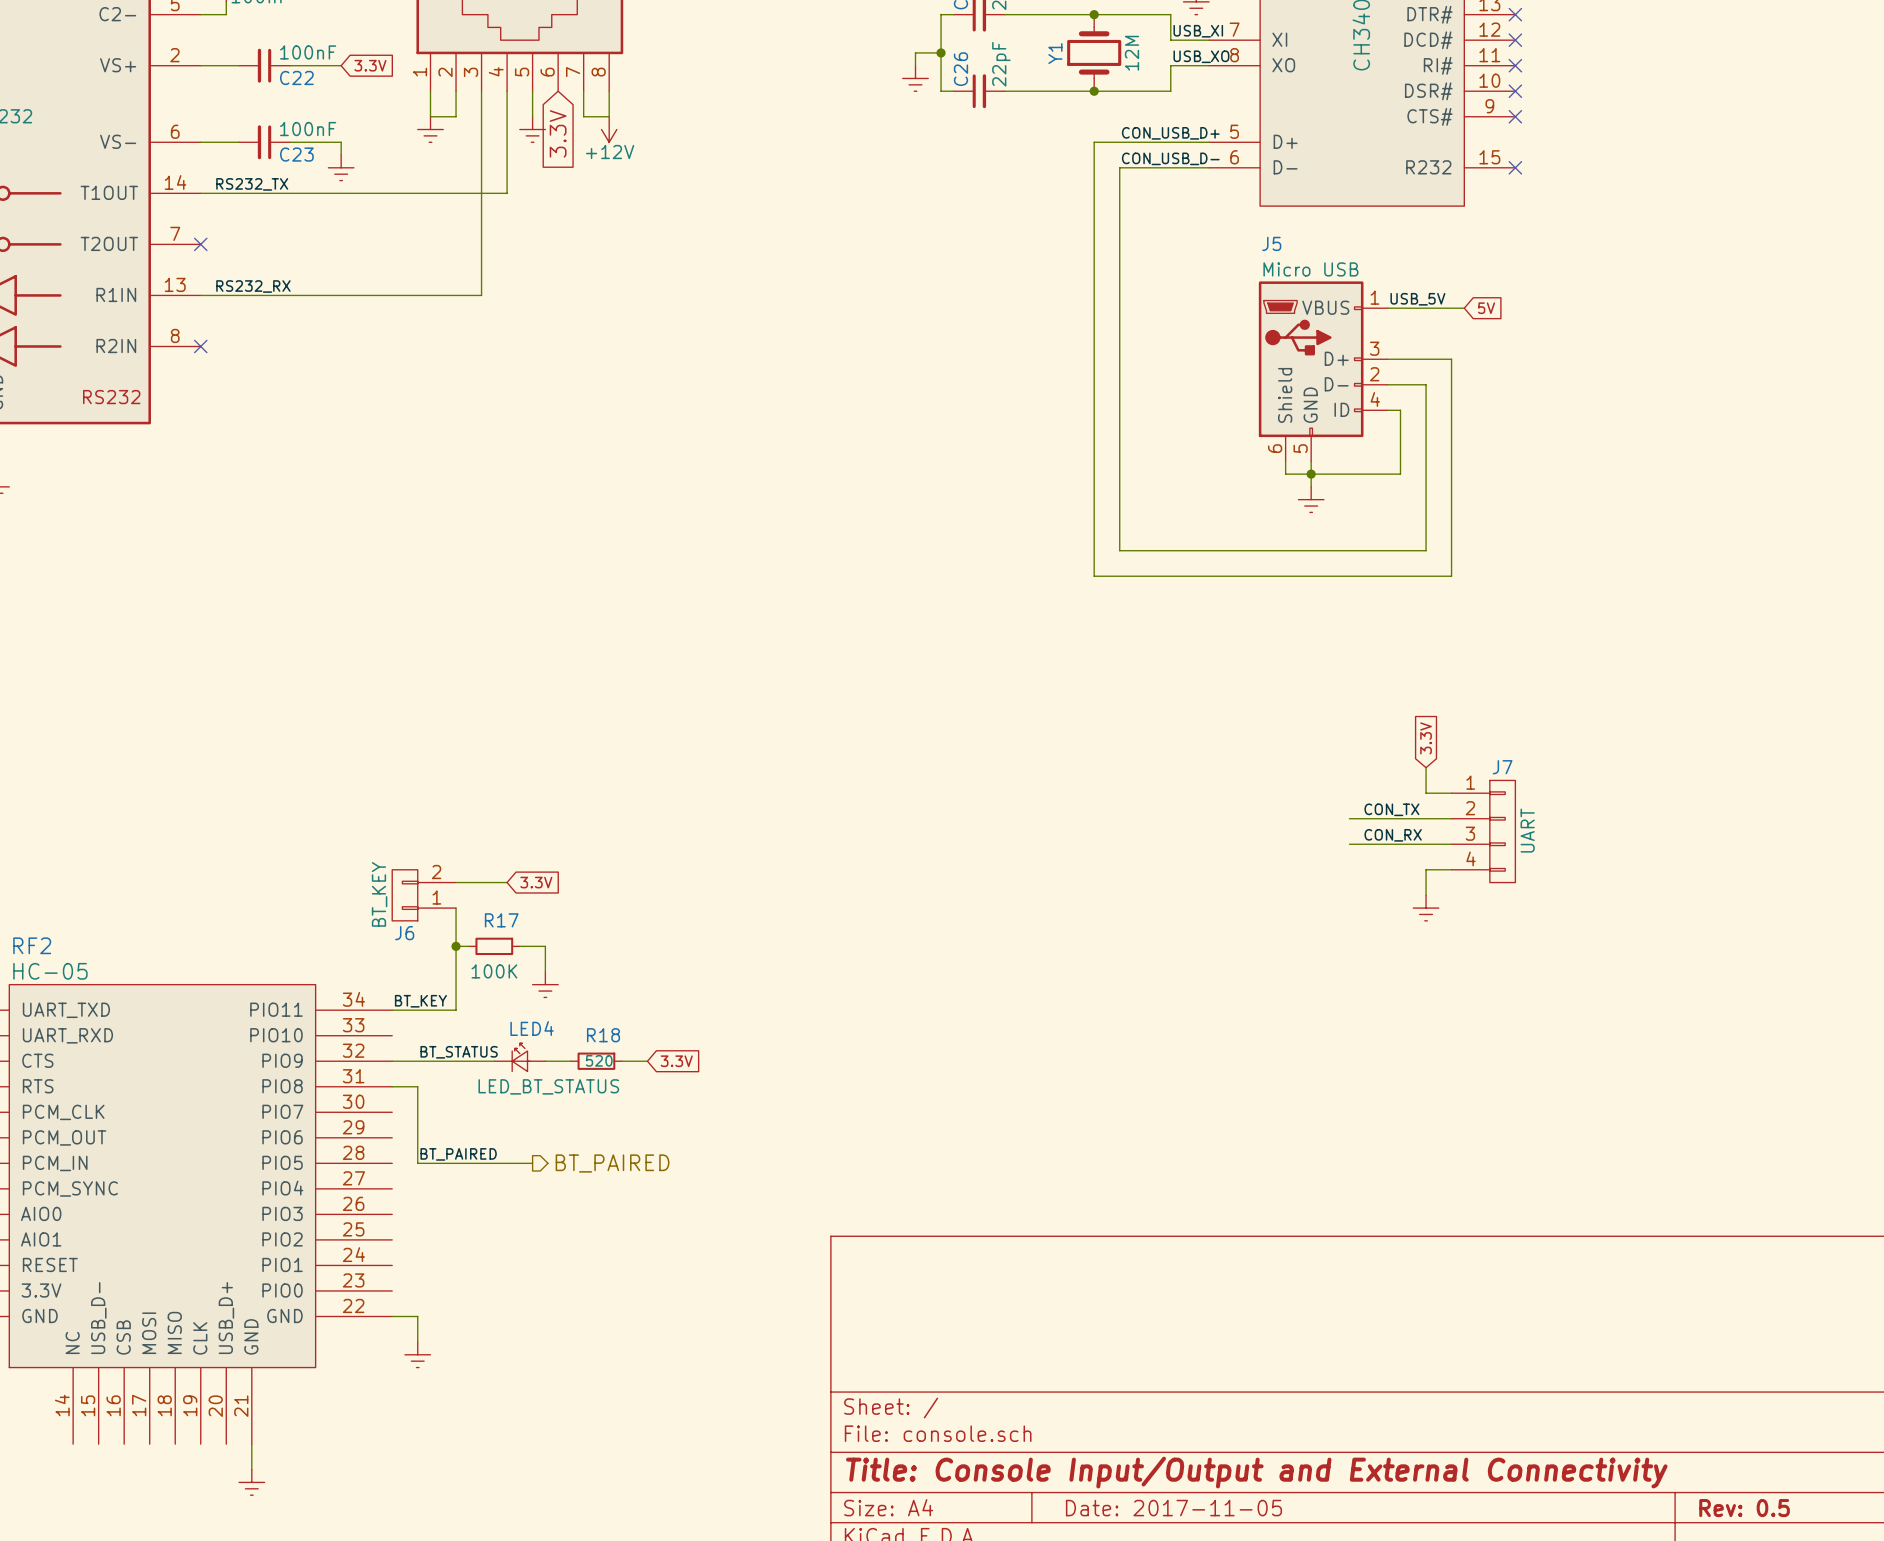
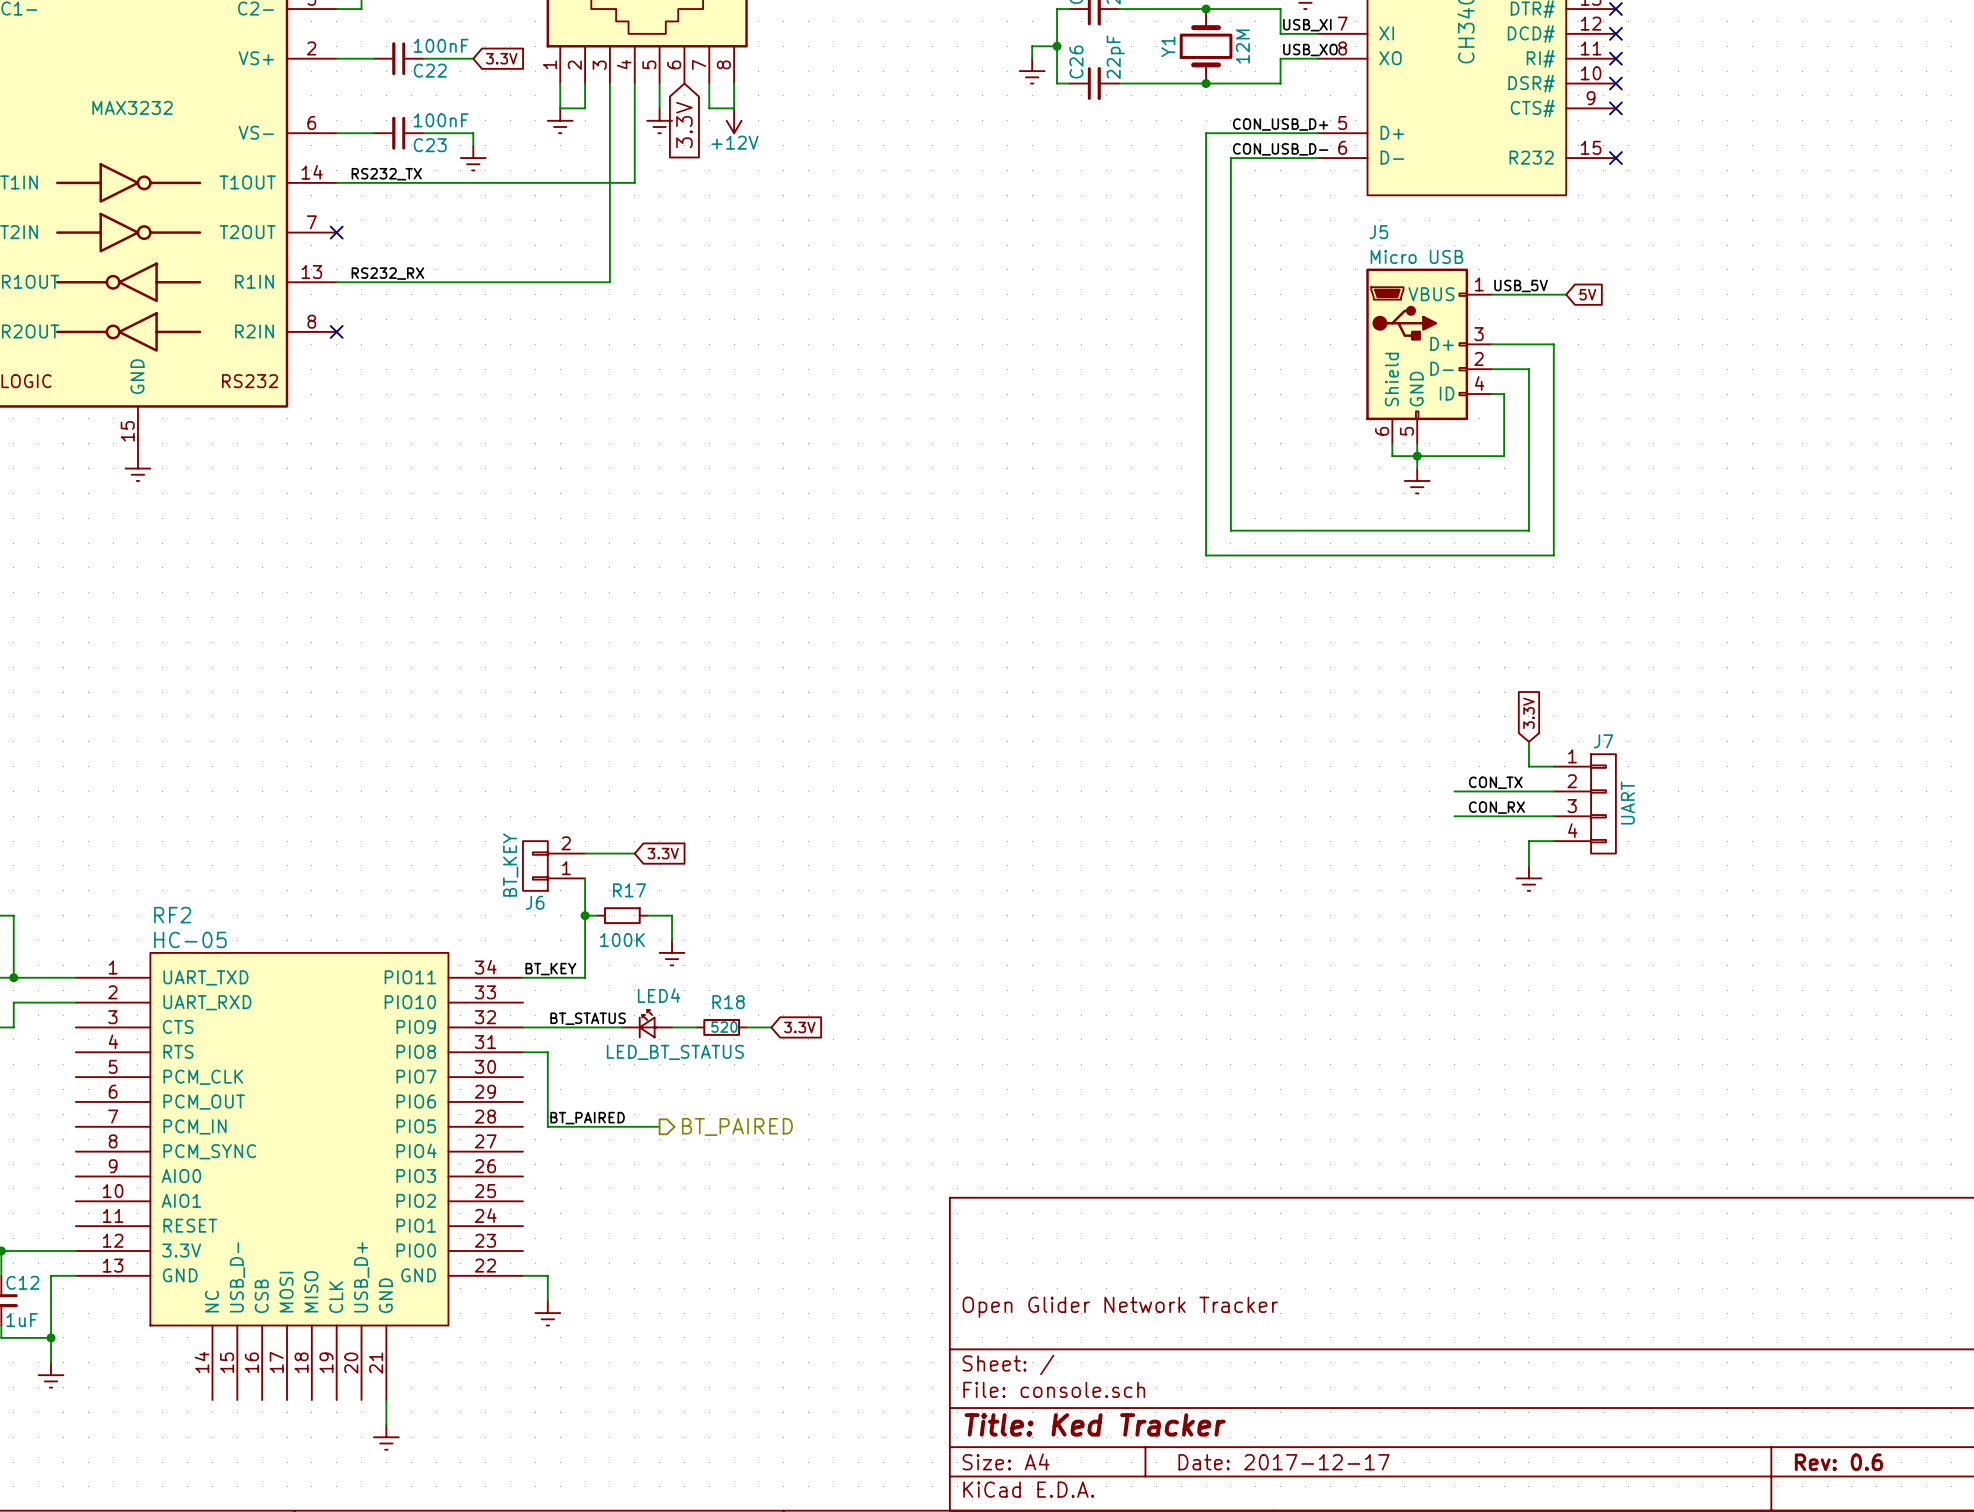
title block: none -> Open Glider Network Tracker (1120, 1307)
title block: Title: Console Input/Output and External Connectivity (1256, 1472) -> Title: Ked Tracker (1095, 1424)
title block: Date: 2017-11-05 (1173, 1508) -> Date: 2017-12-17 (1284, 1462)
title block: Rev: 0.5 (1744, 1508) -> Rev: 0.6 (1838, 1462)

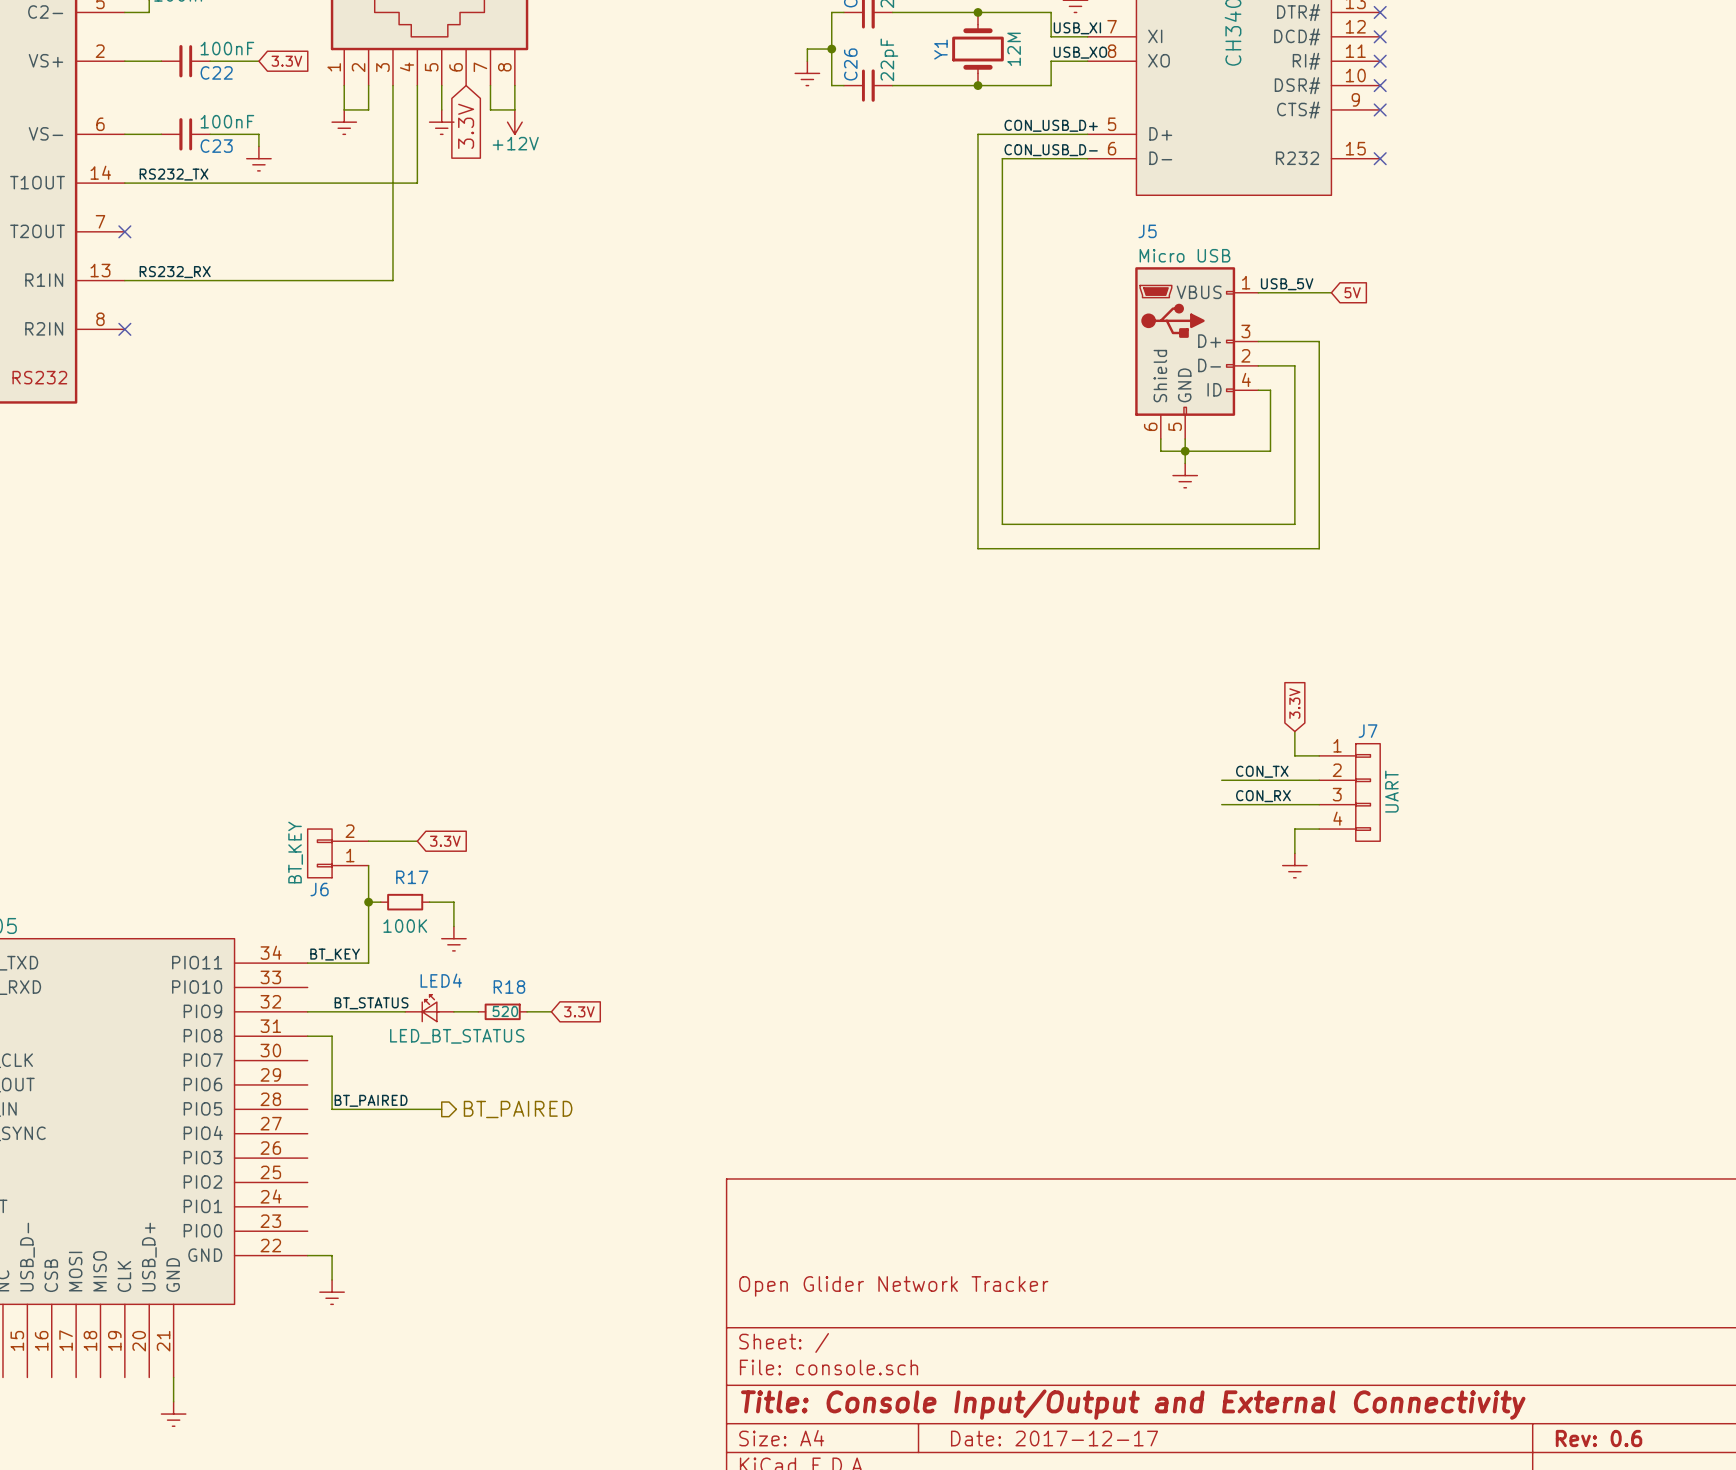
title block: Title: Ked Tracker (1095, 1424) -> Title: Console Input/Output and External Connectivity (1133, 1404)

